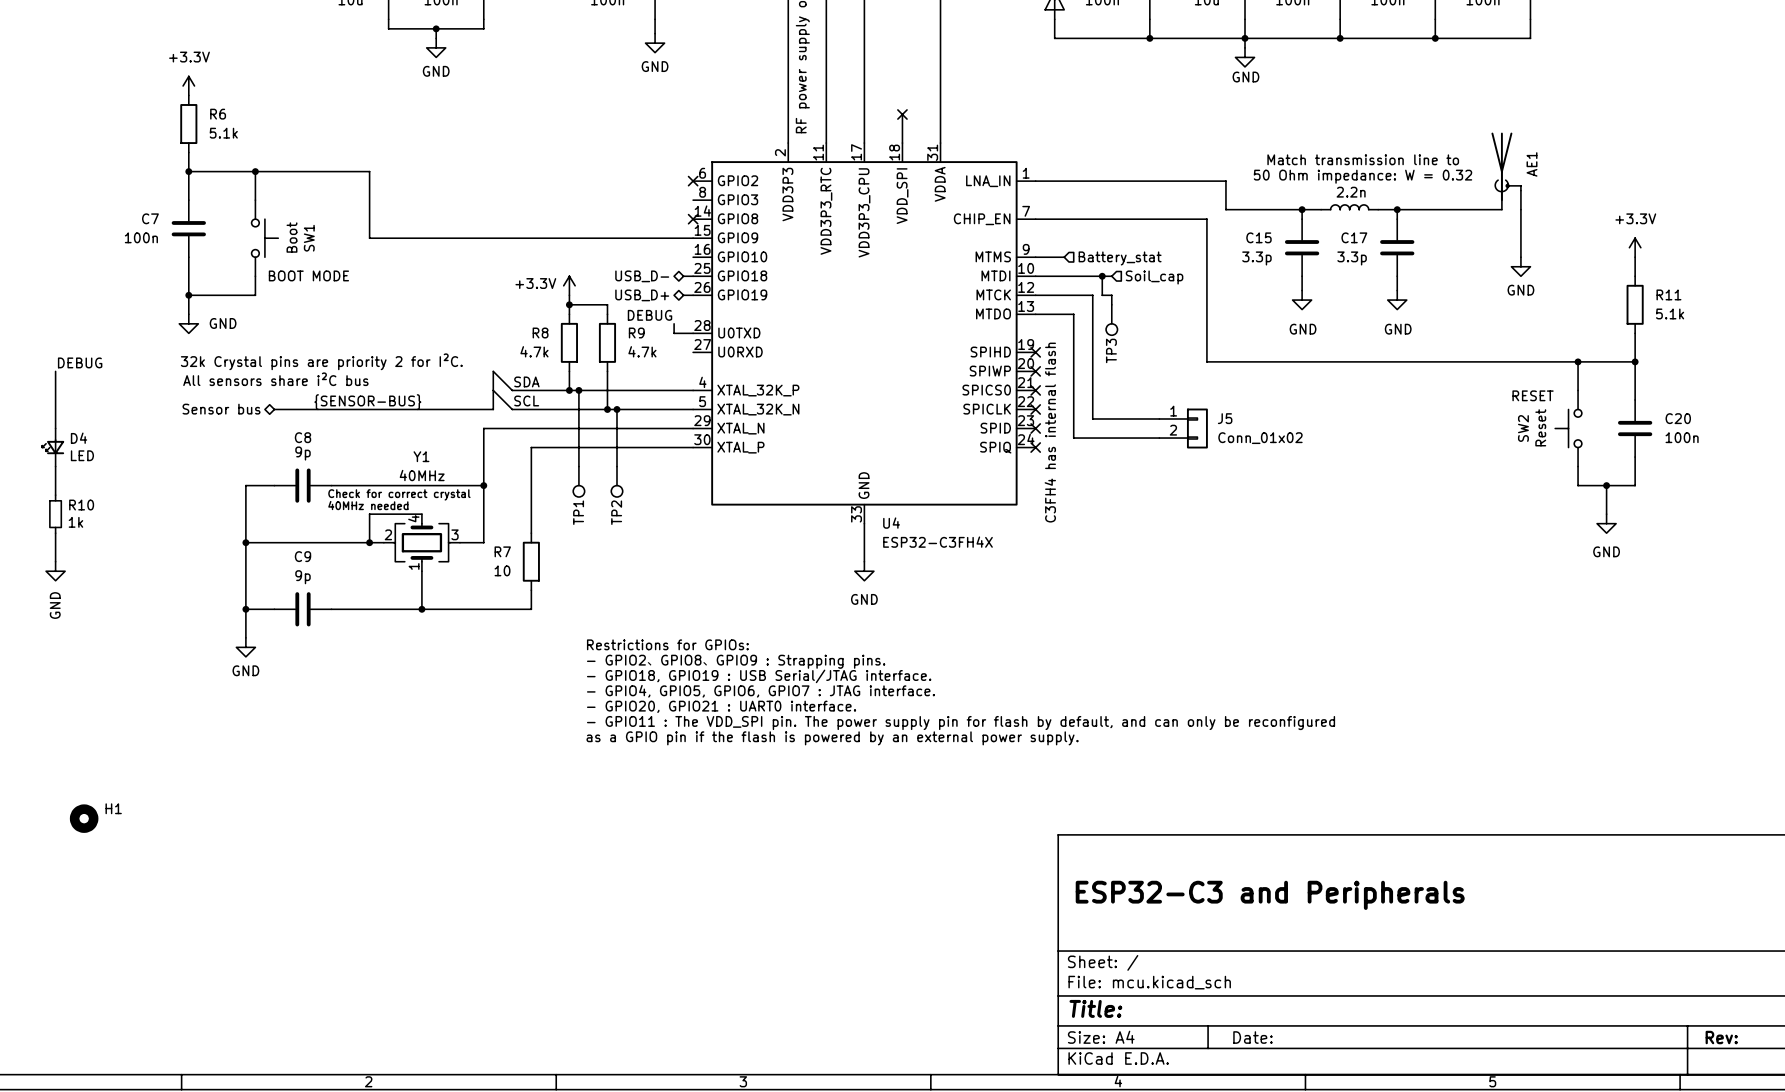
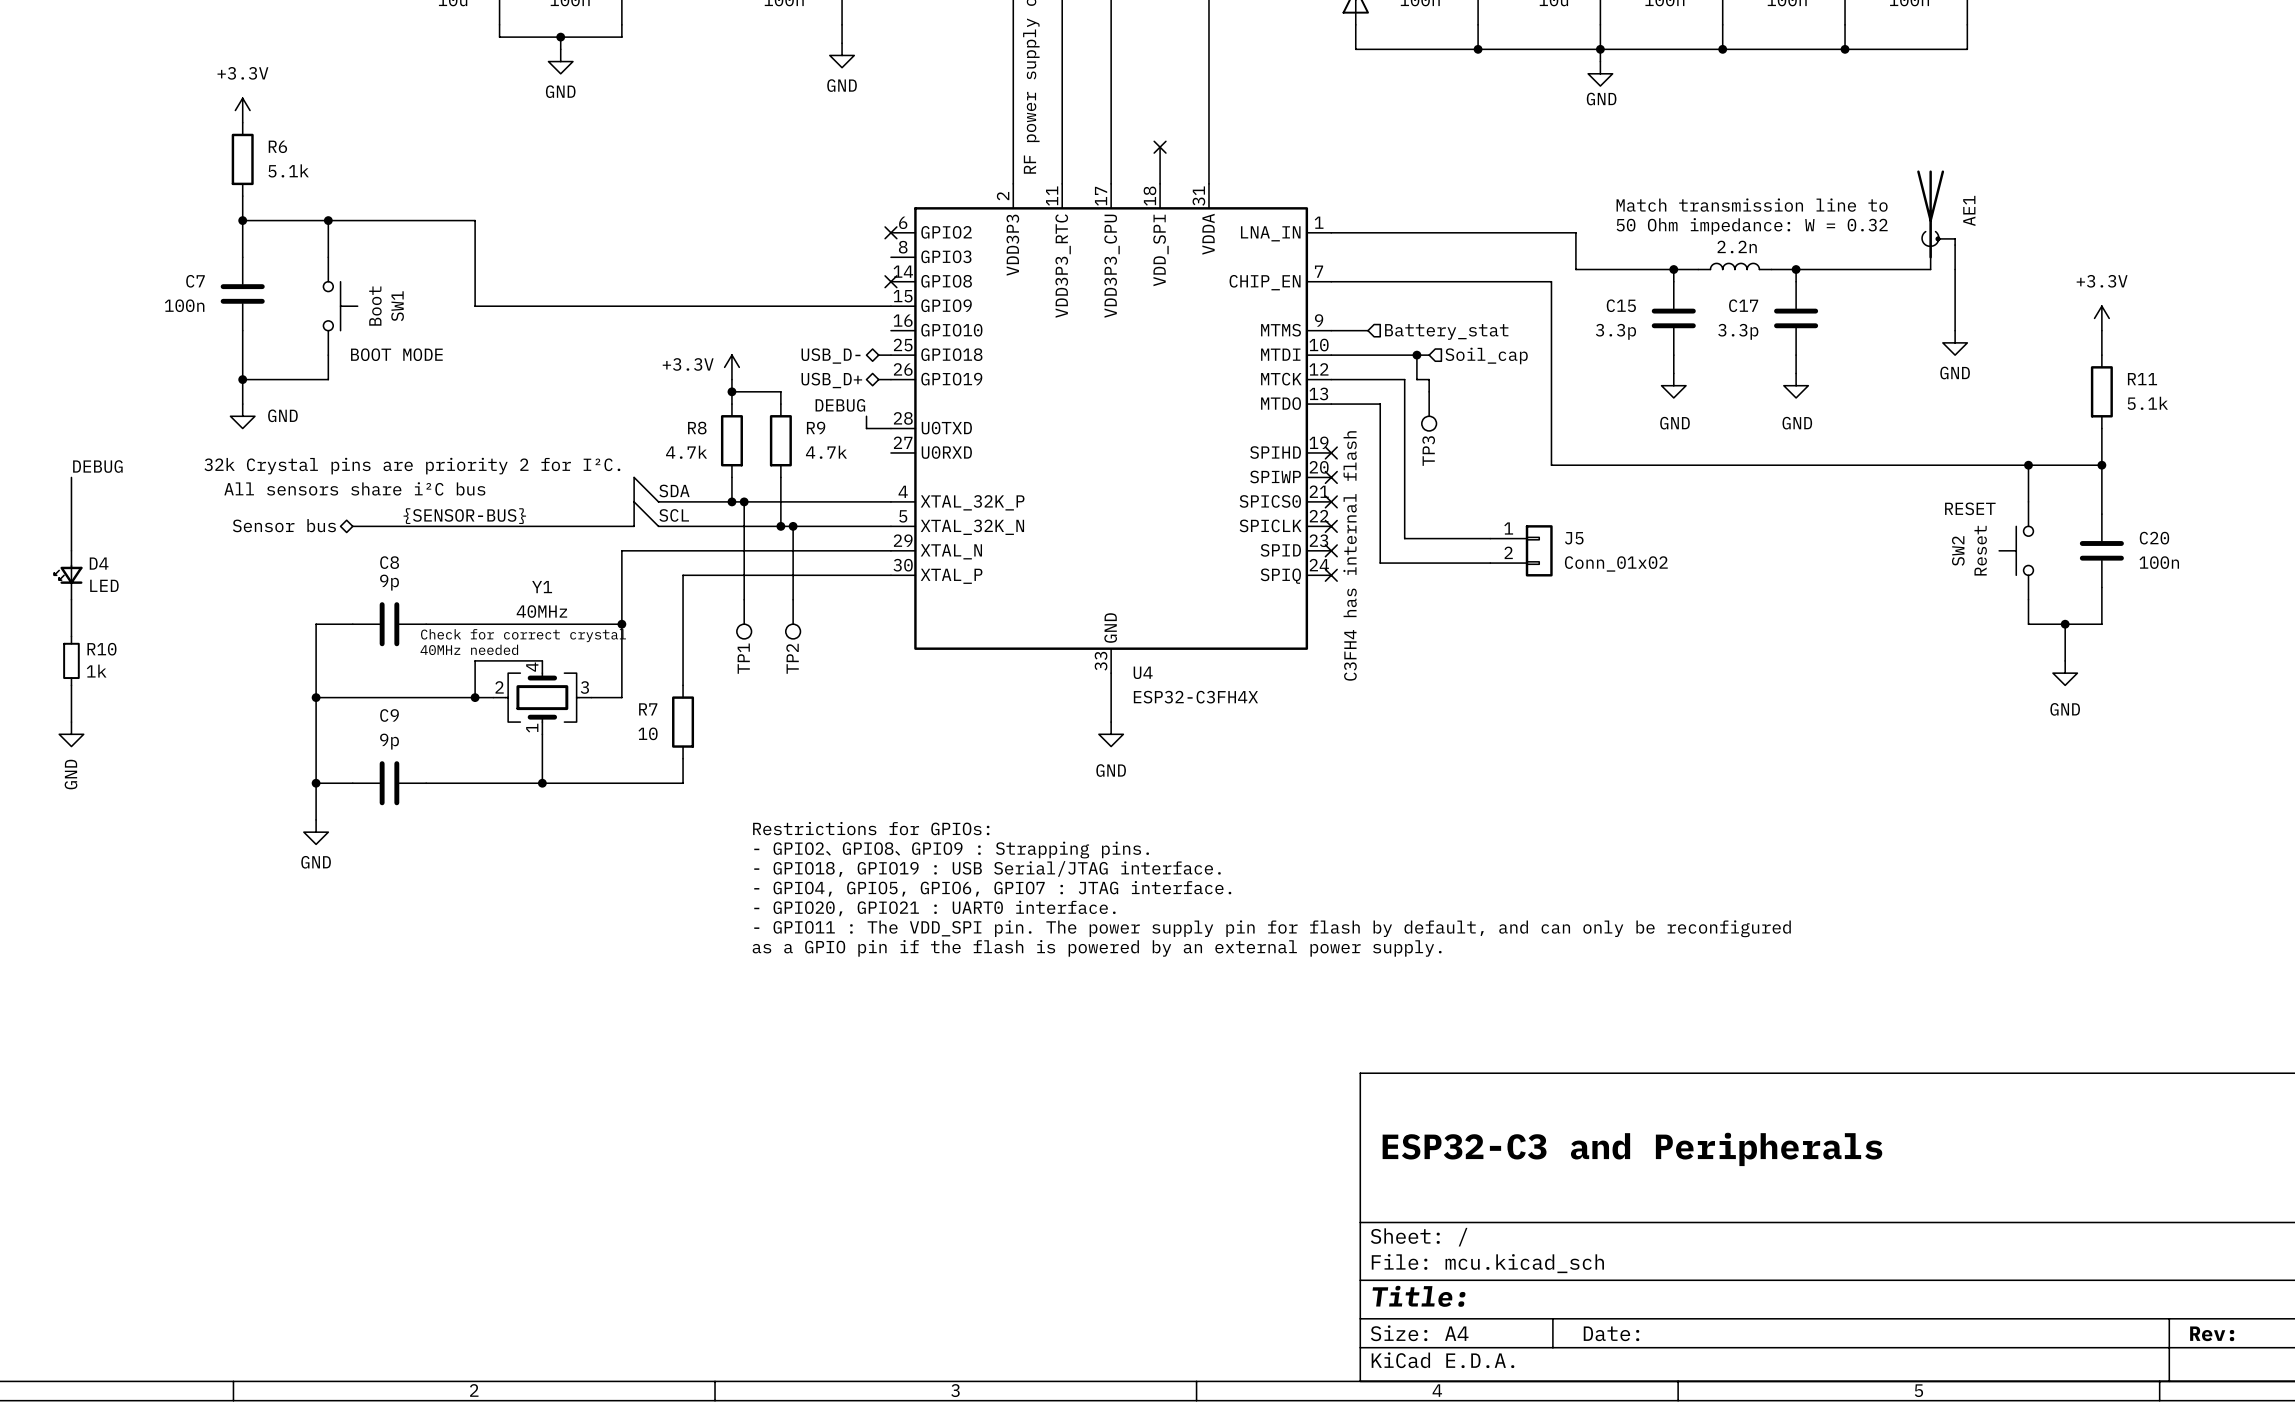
H1: (84, 818) -> none

